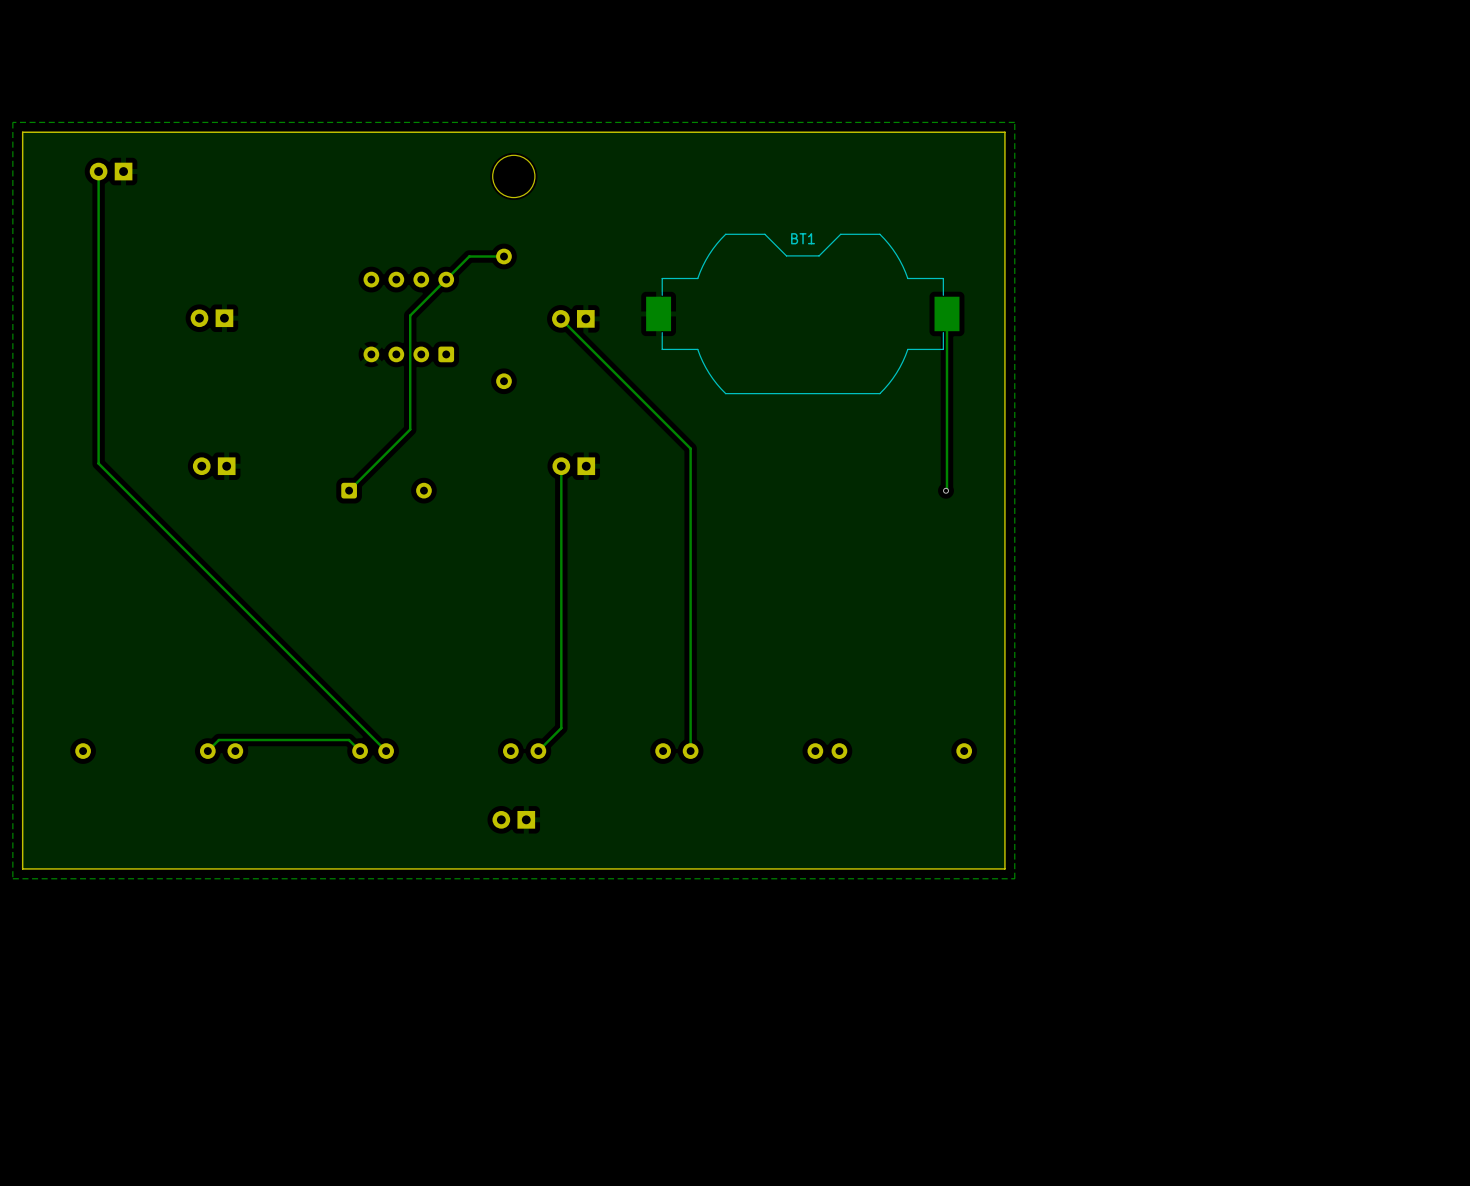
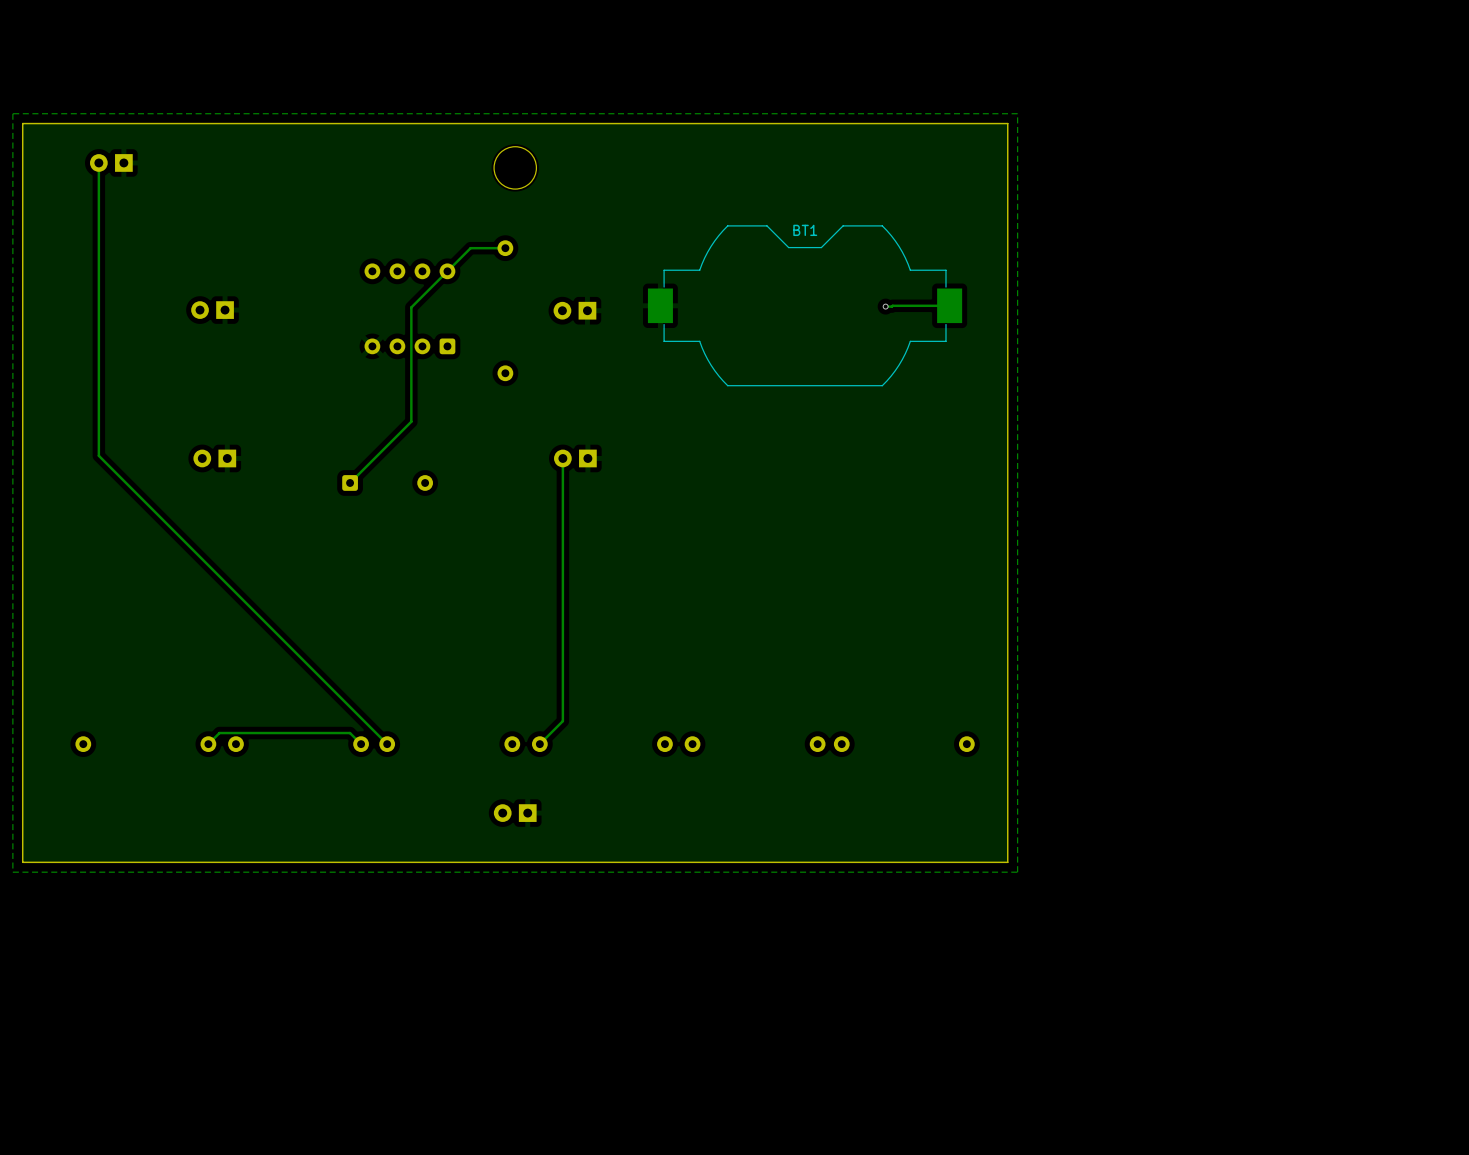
track: (946, 313) (946, 490) -> (949, 305) (885, 306)
via: none -> (885, 306)
track: (560, 318) (690, 448) (690, 751) -> none
via: (946, 490) -> none

